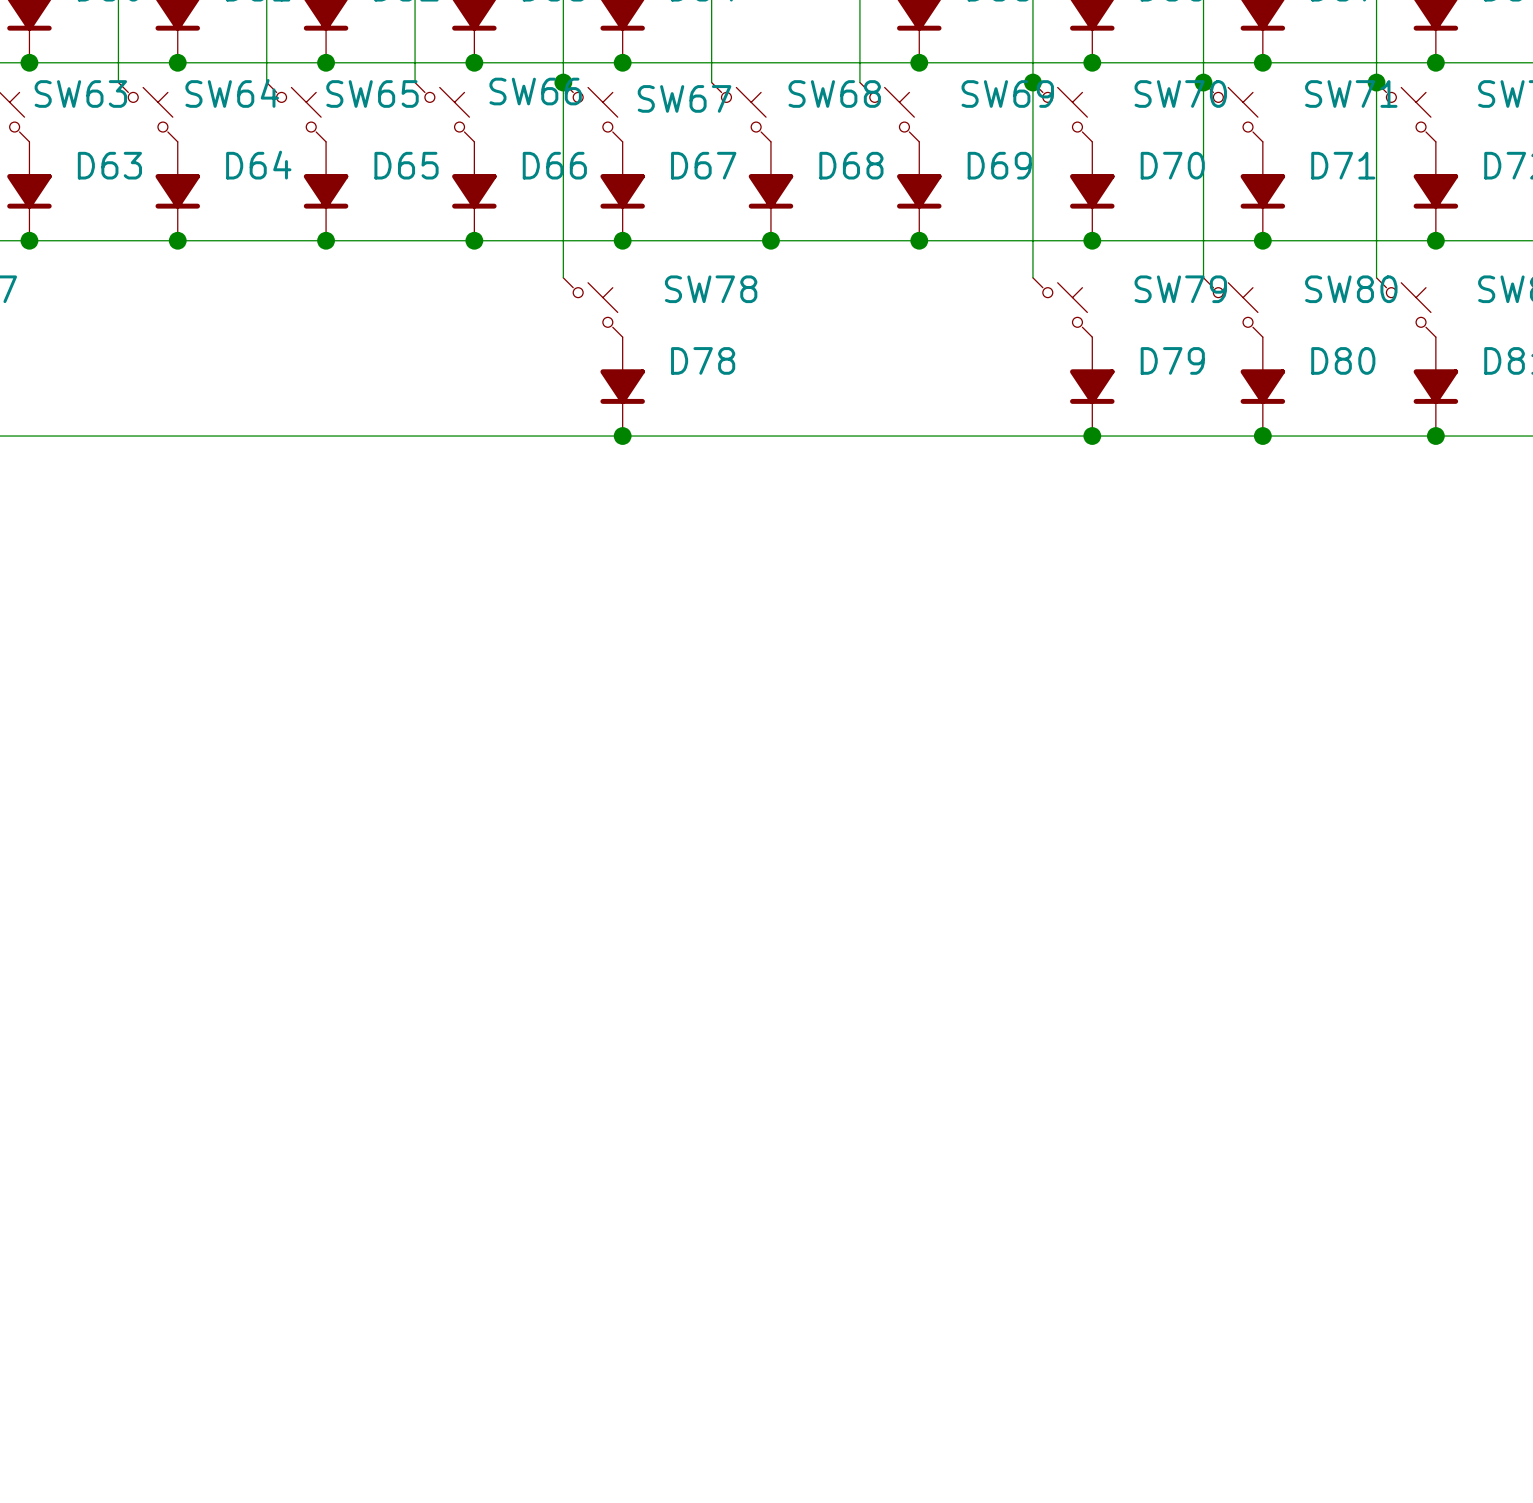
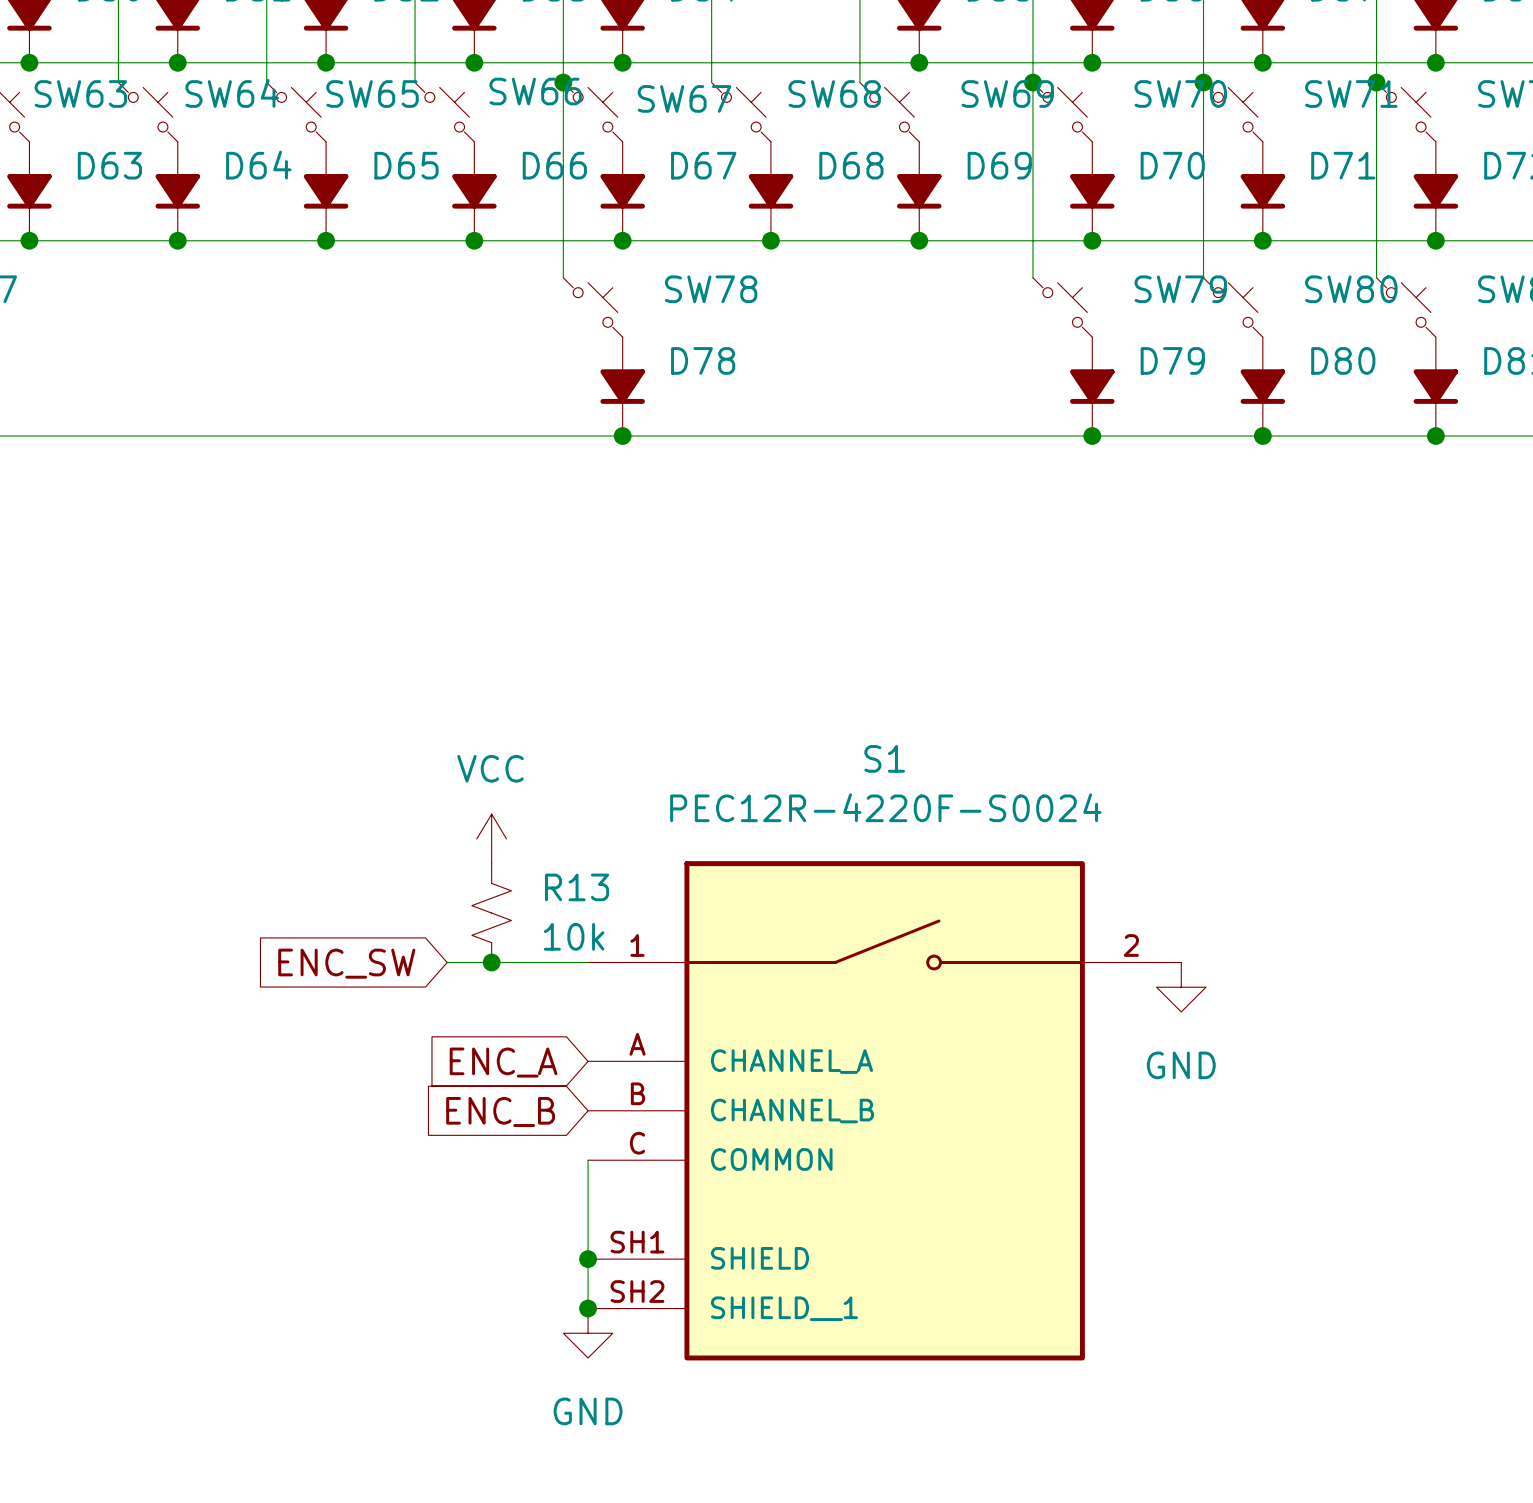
power symbol: none -> VCC (491, 838)
R13: none -> 10k (491, 913)
wire: none -> (447, 962) (588, 962)
junction: none -> (491, 962)
global label: none -> ENC_SW (346, 963)
power symbol: none -> GND (1181, 987)
global label: none -> ENC_A (503, 1062)
S1: none -> PEC12R-4220F-S0024 (884, 1110)
global label: none -> ENC_B (500, 1111)
wire: none -> (588, 1160) (588, 1308)
junction: none -> (588, 1259)
junction: none -> (588, 1308)
power symbol: none -> GND (588, 1333)

